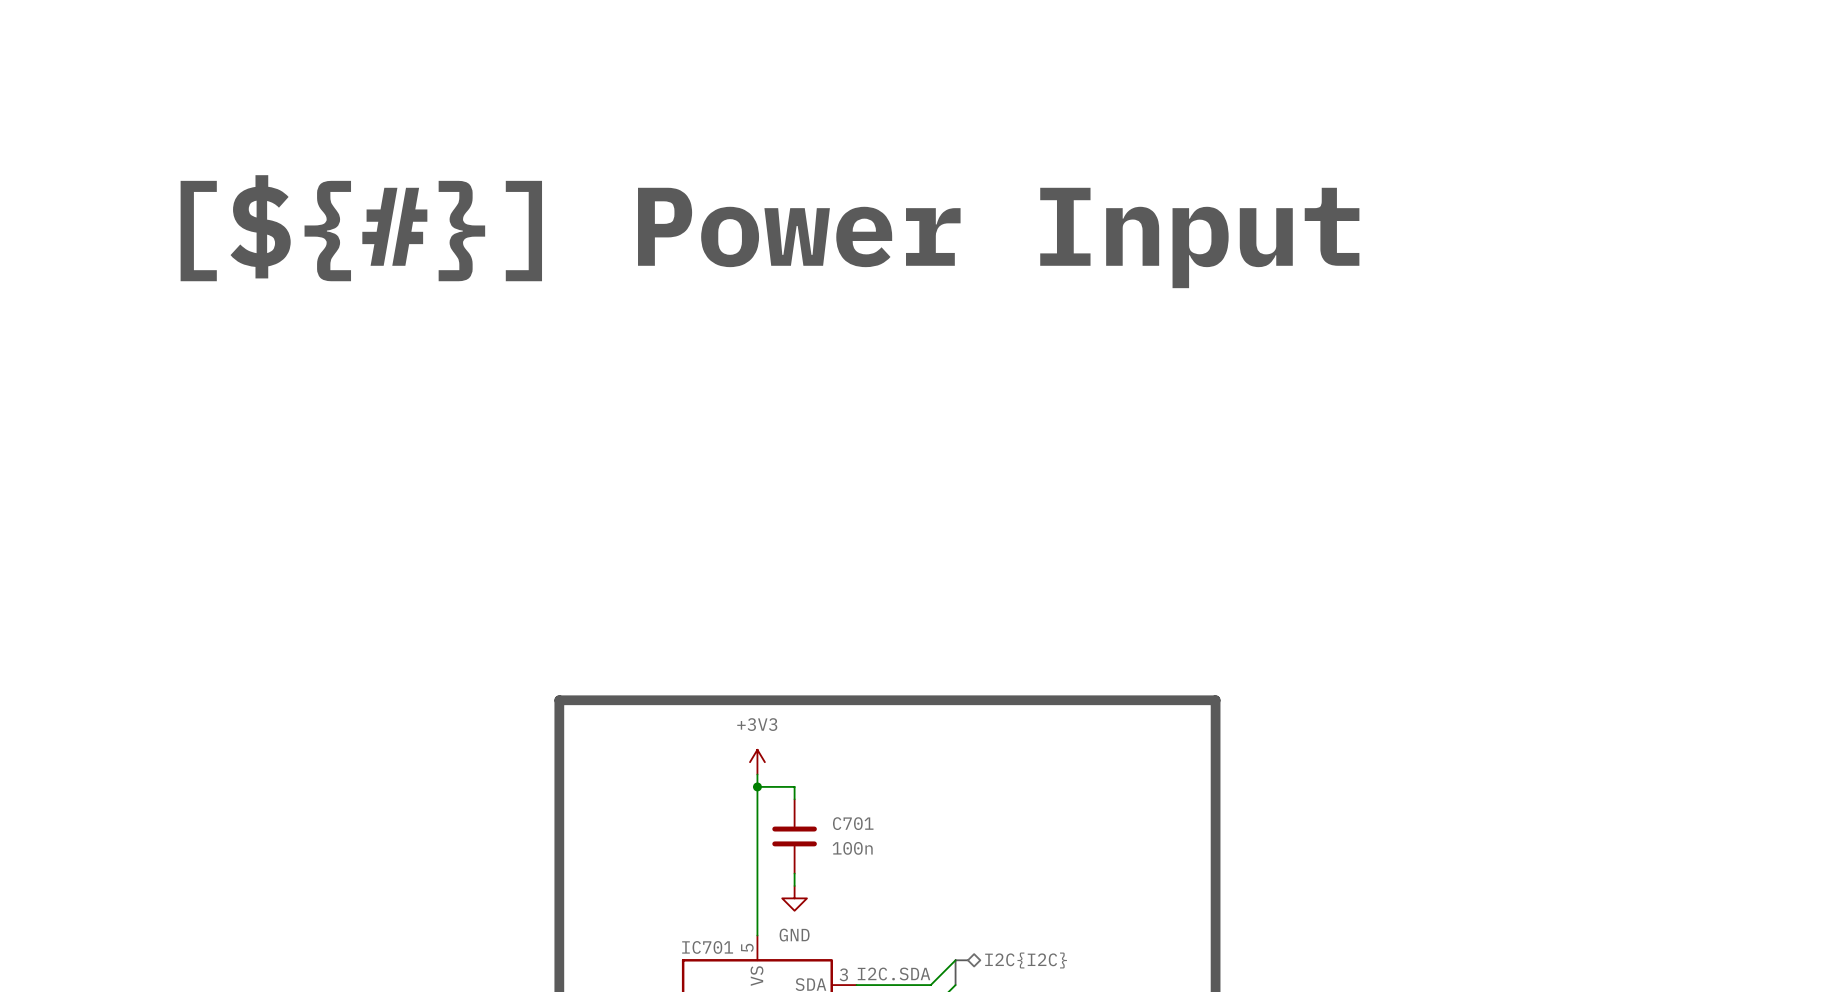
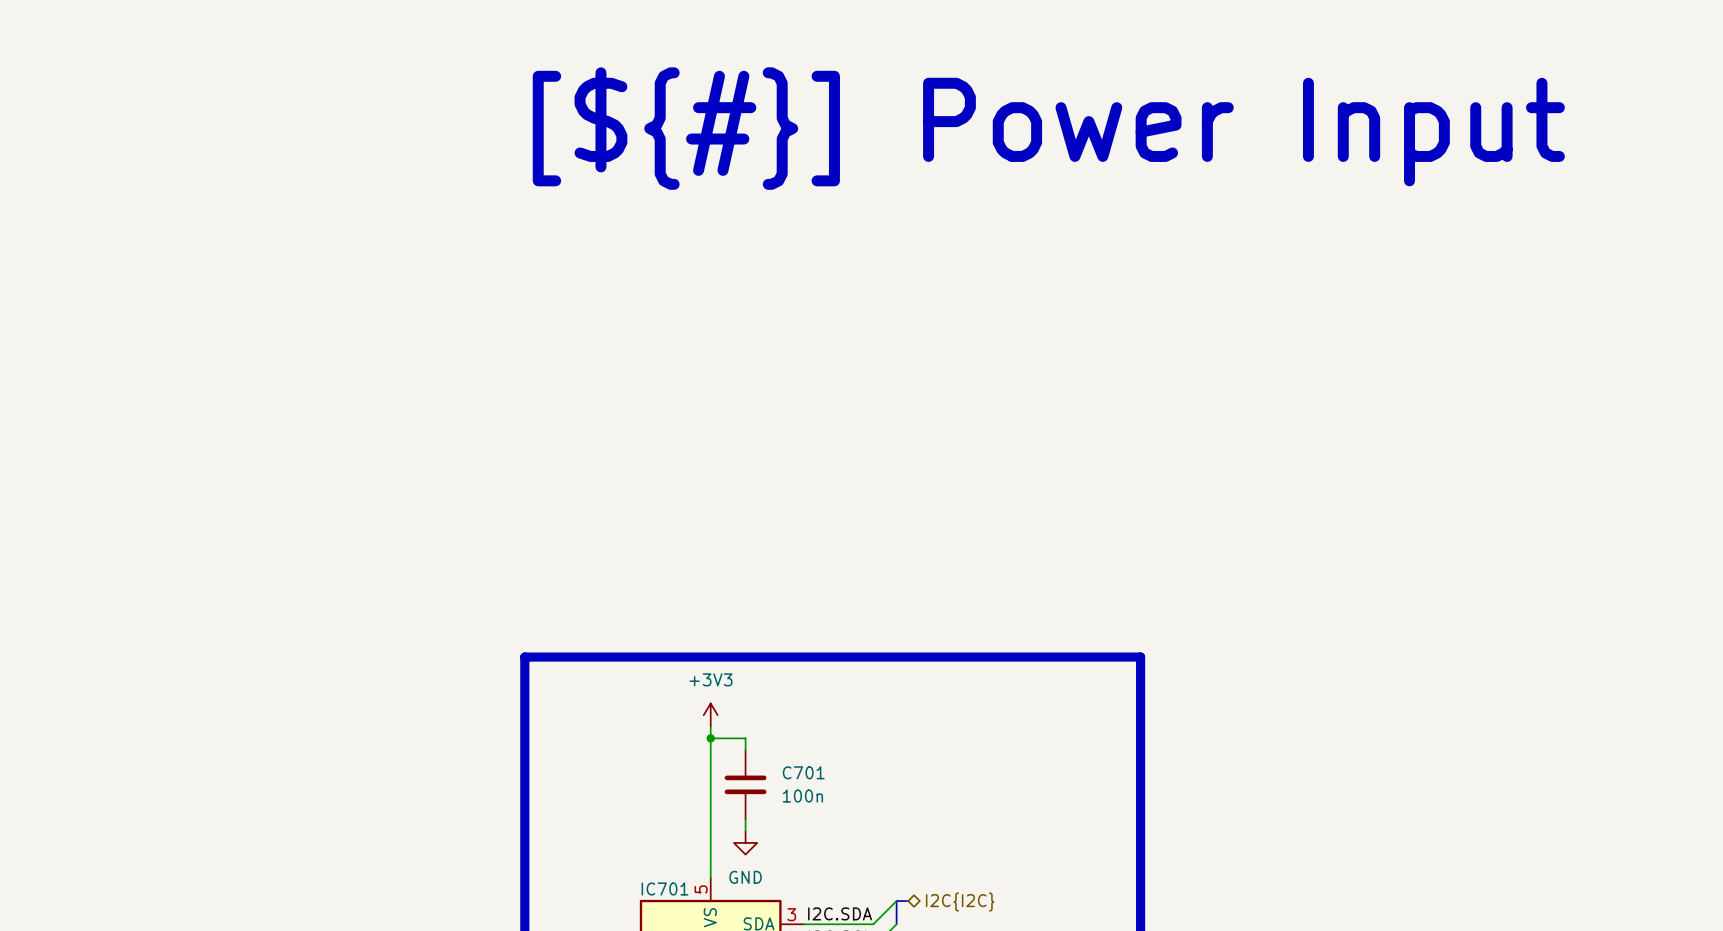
text: none -> [${#}] Power Input (1048, 128)
text: [${#}] Power Input (770, 231) -> none

